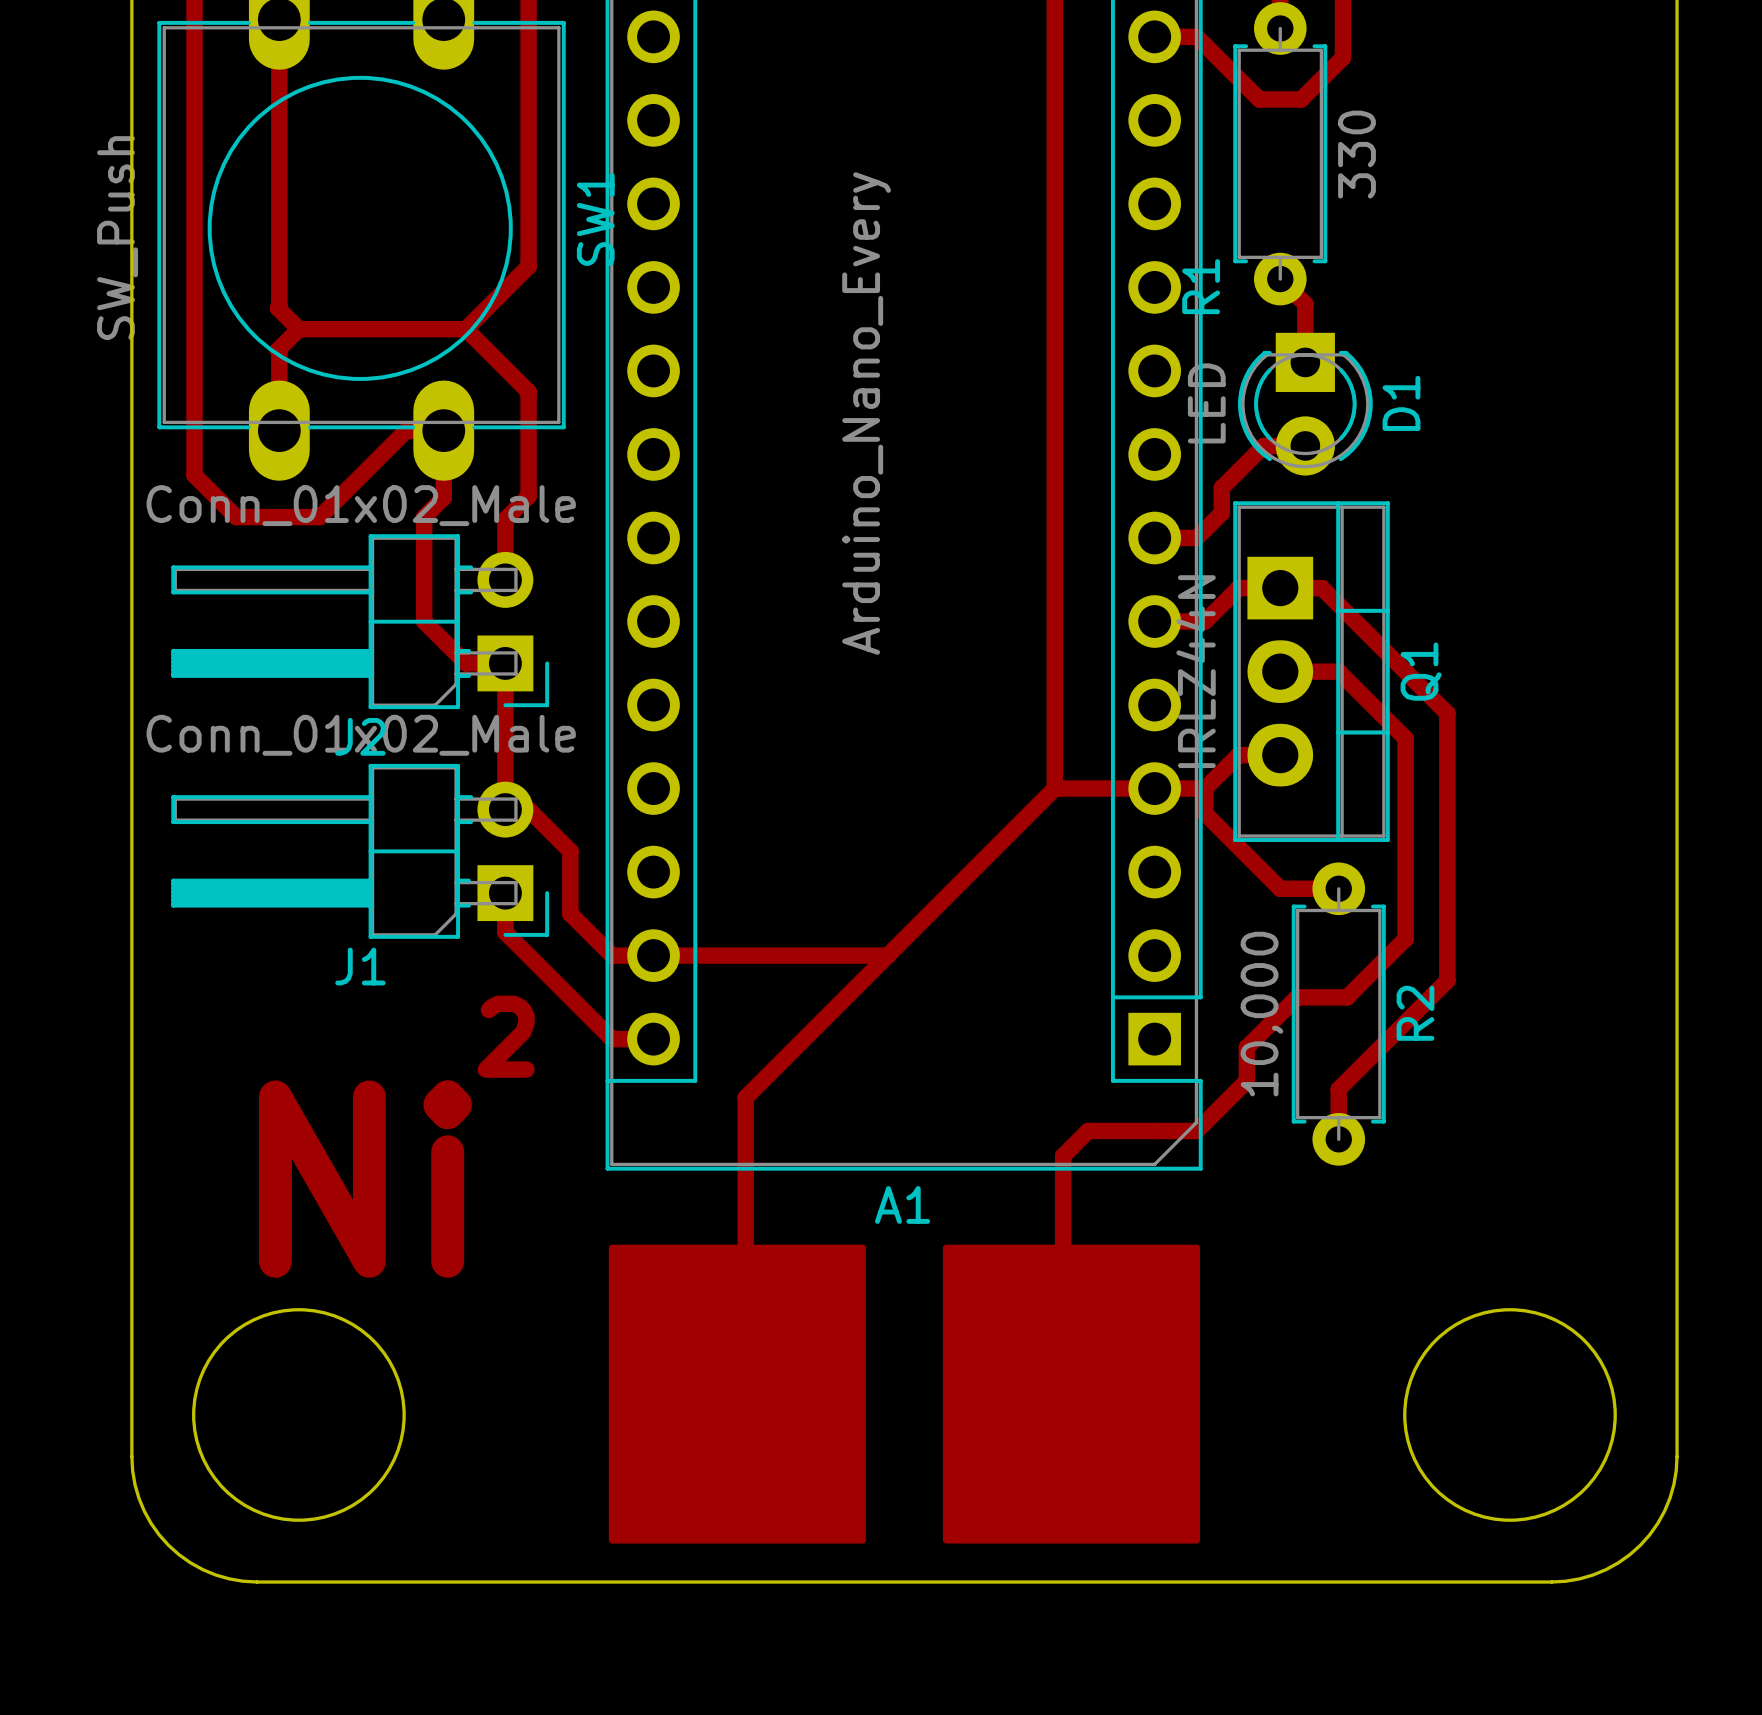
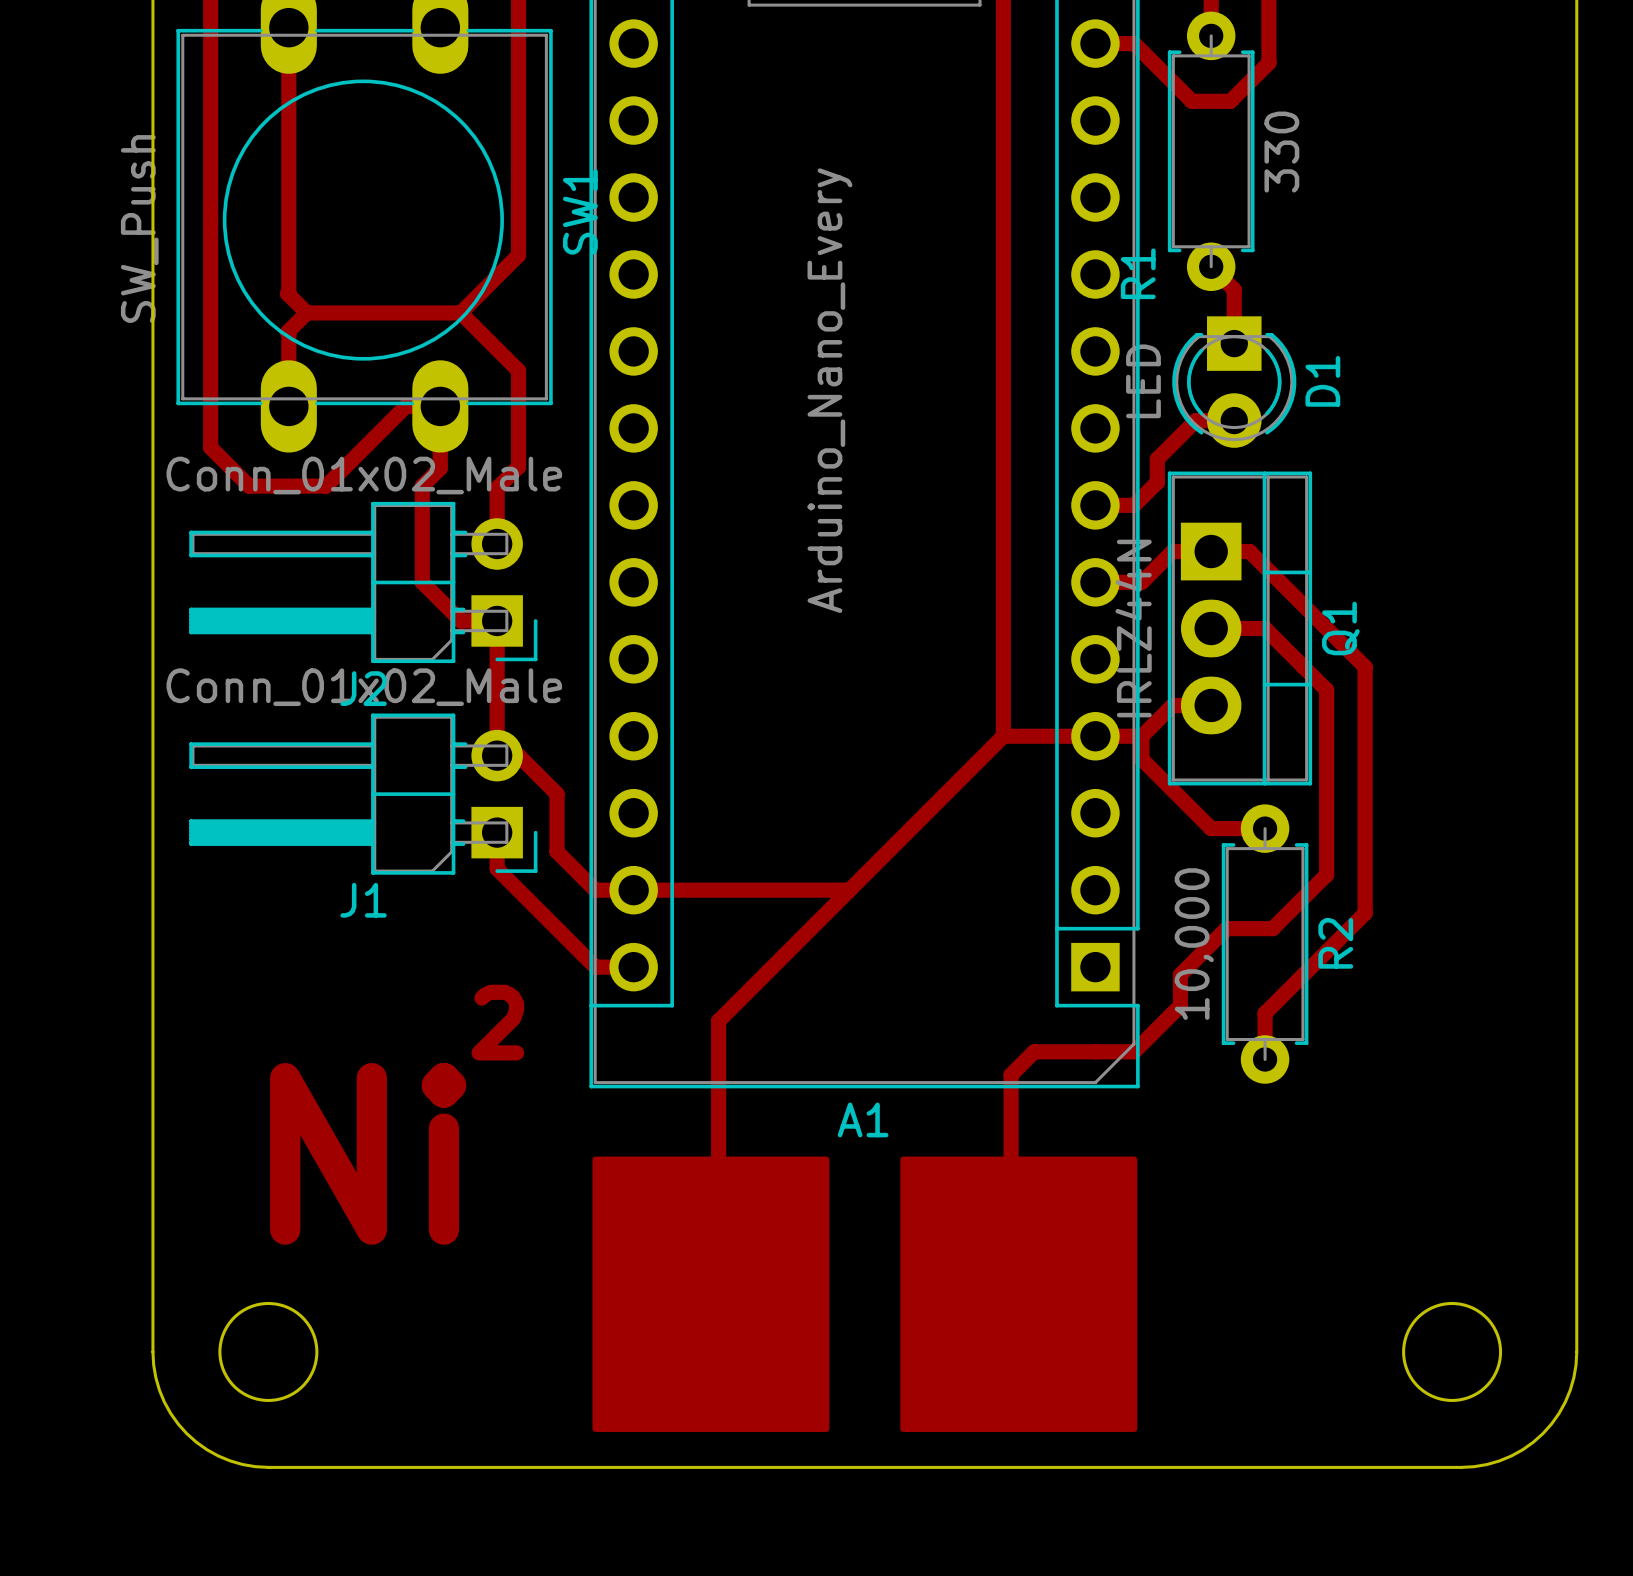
text position: 2 (506, 1036) -> 2 (497, 1022)
text position: Ni (365, 1179) -> Ni (368, 1153)
round board edge: [192, 1308, 406, 1522] -> none
round board edge: [1403, 1308, 1617, 1522] -> none
round board edge: none -> [218, 1301, 319, 1402]
round board edge: none -> [1402, 1301, 1503, 1402]

